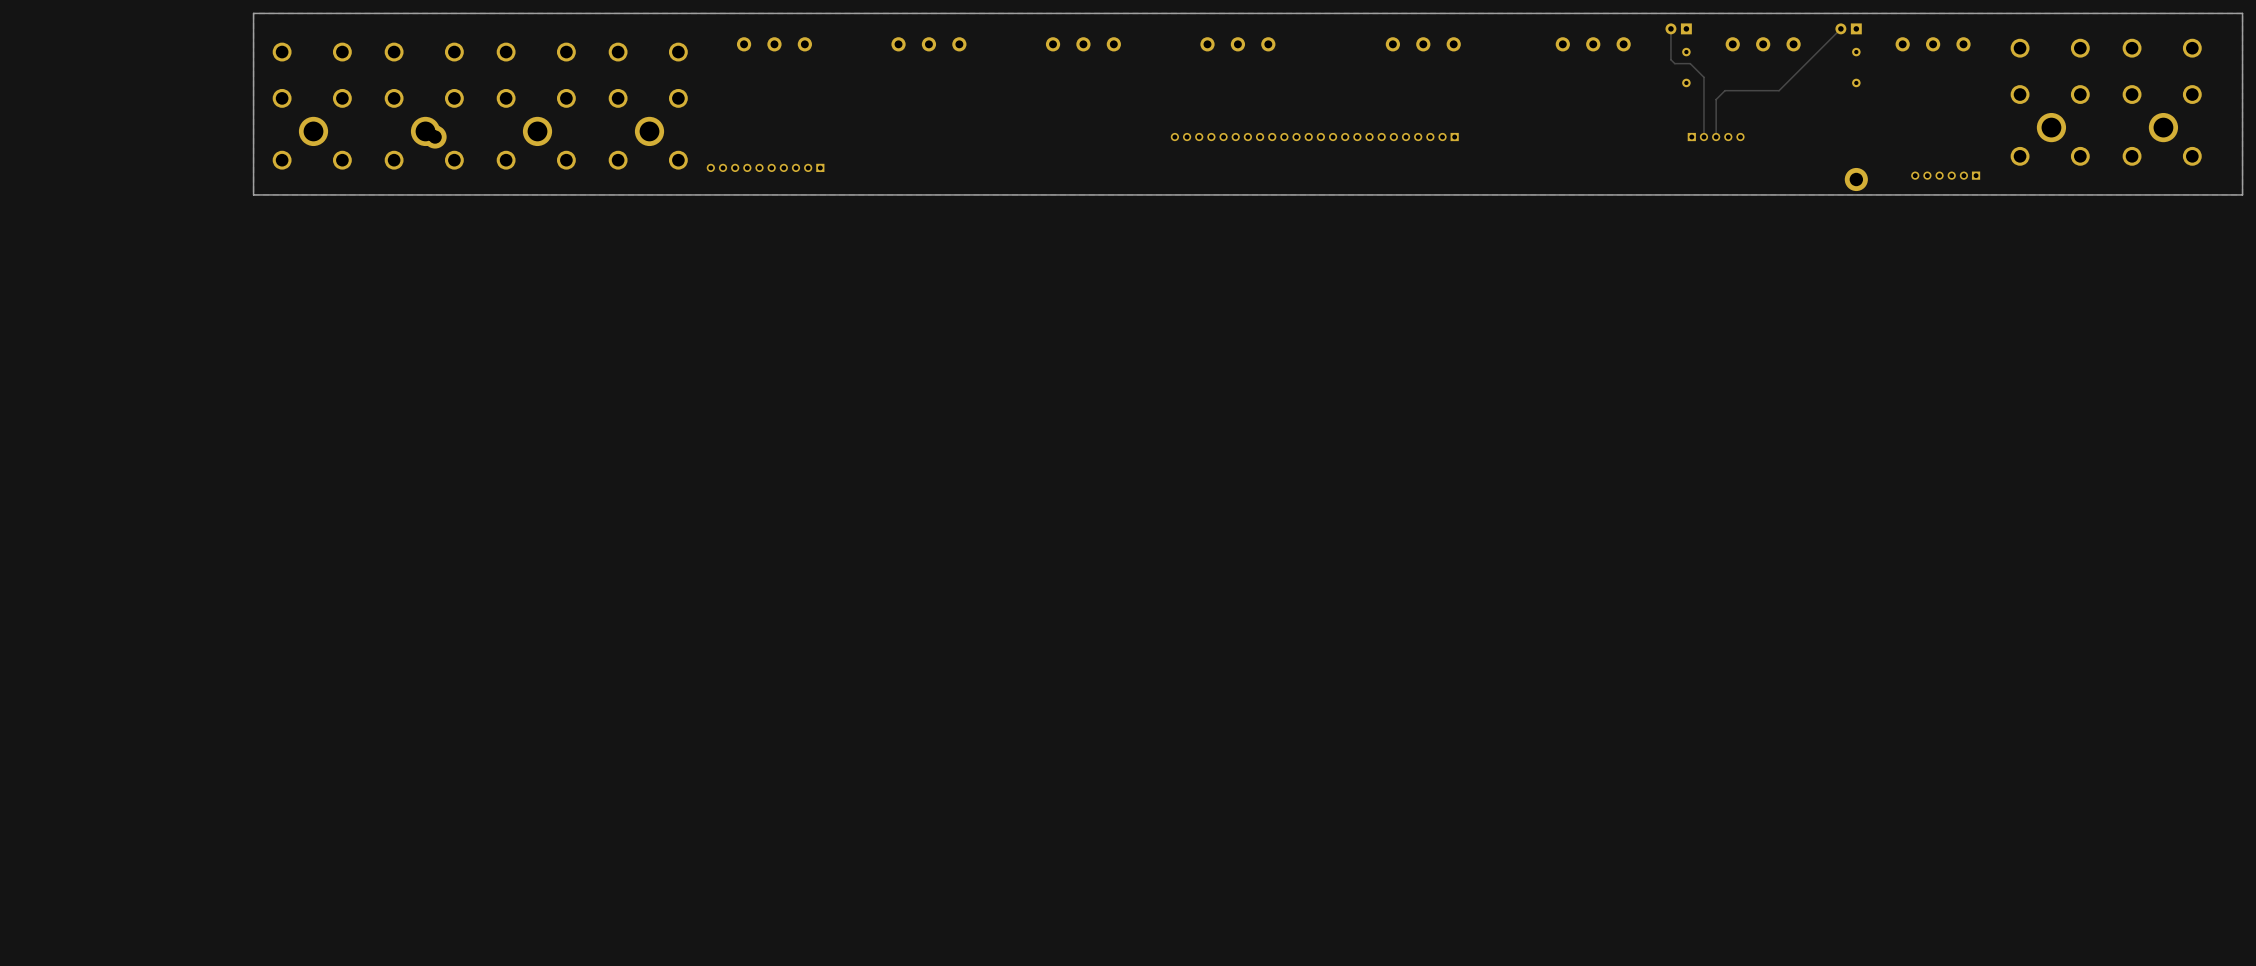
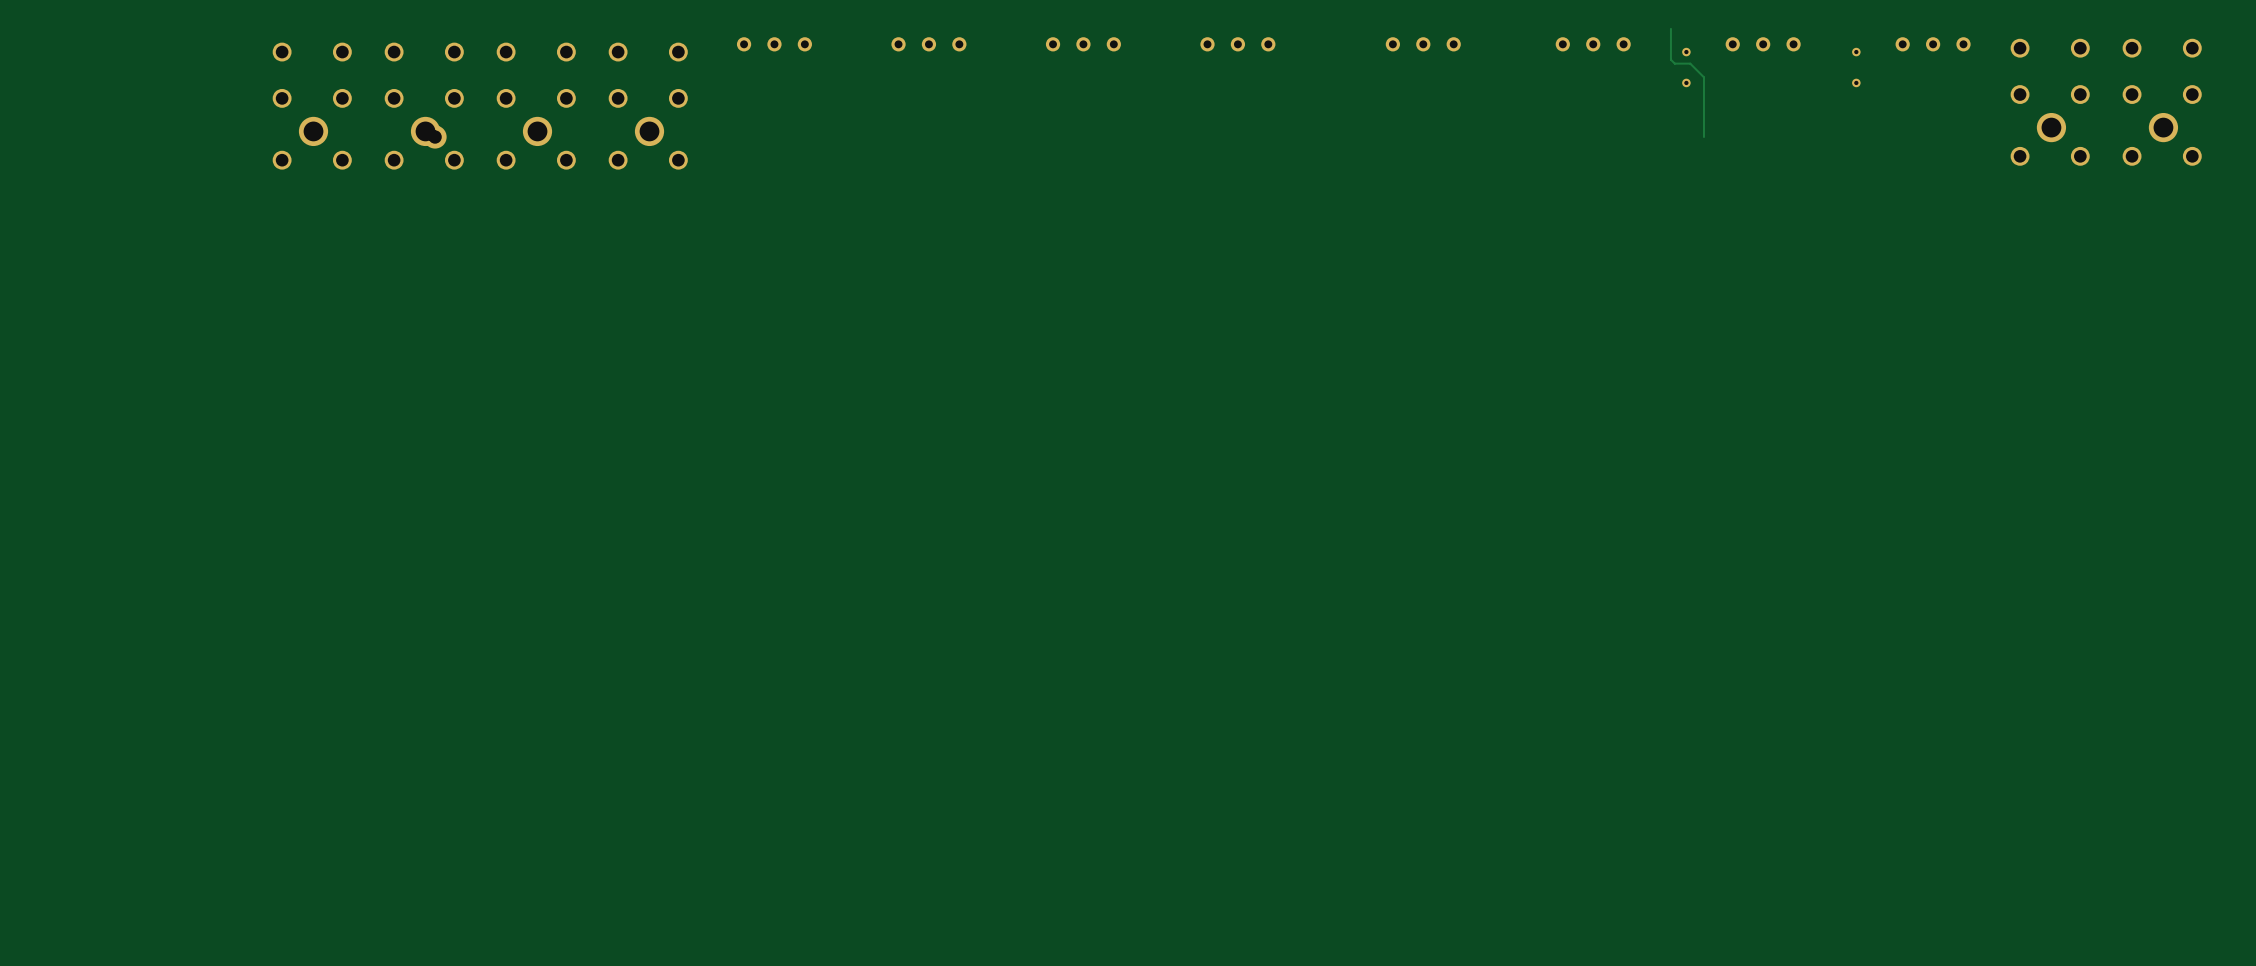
board edge: (2242, 13) (2242, 194) (253, 194) (253, 13) (2242, 13) -> none
part: (1678, 28) -> none
track: (1840, 28) (1779, 90) (1725, 90) (1716, 99) (1716, 137) -> none
part: (1848, 28) -> none
part: (1314, 137) -> none
part: (1716, 137) -> none
part: (765, 167) -> none
part: (1945, 175) -> none
part: (1856, 179) -> none

